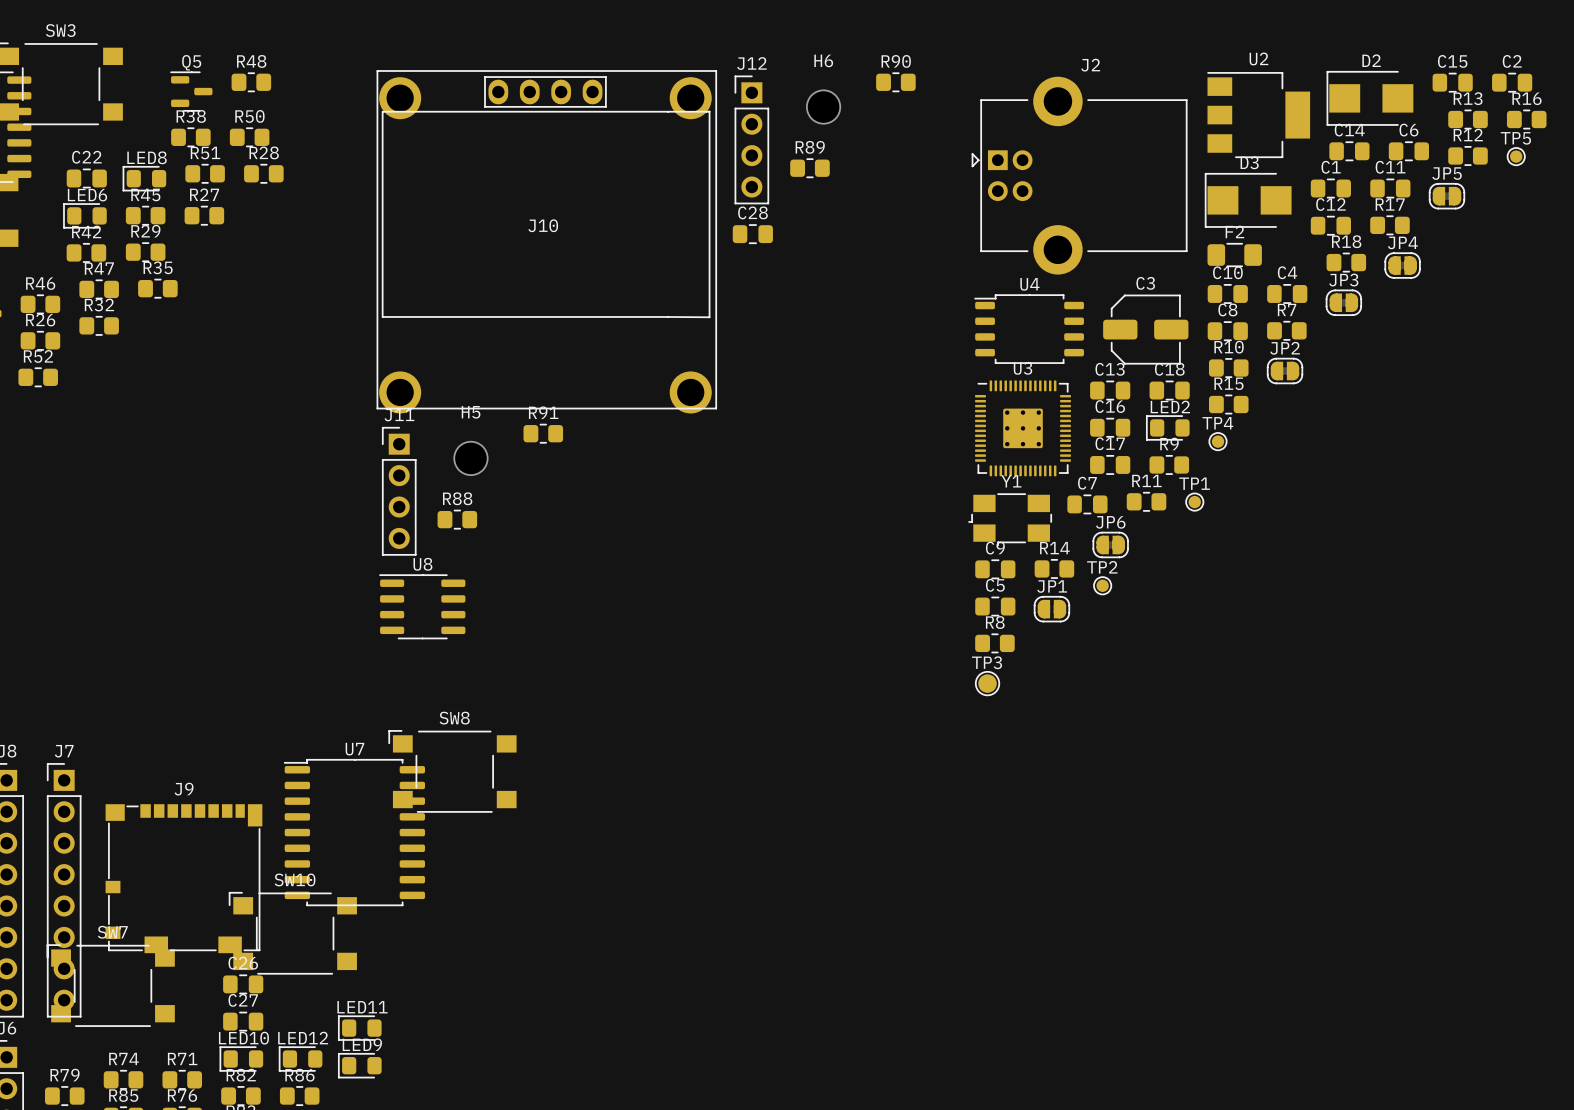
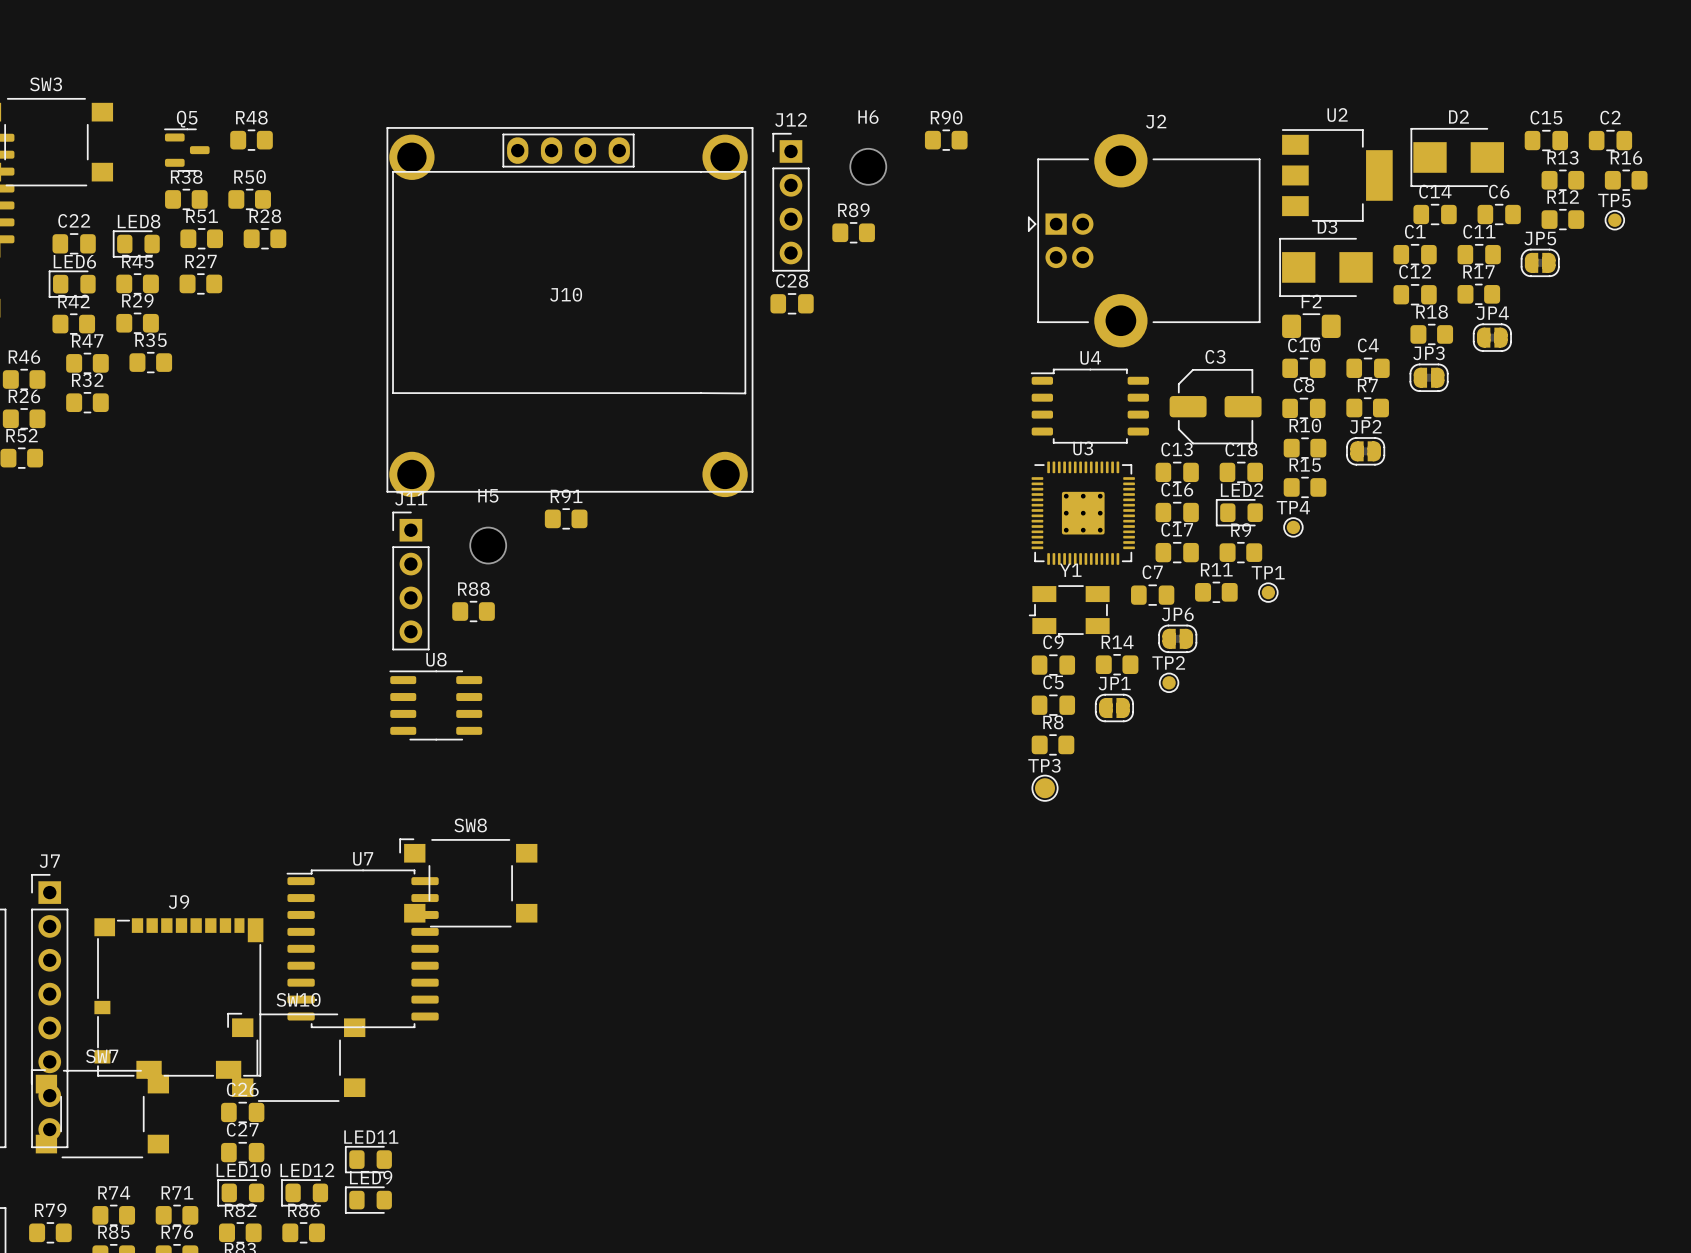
Y1 footprint: [968, 493, 1052, 547] -> [1028, 585, 1110, 639]

